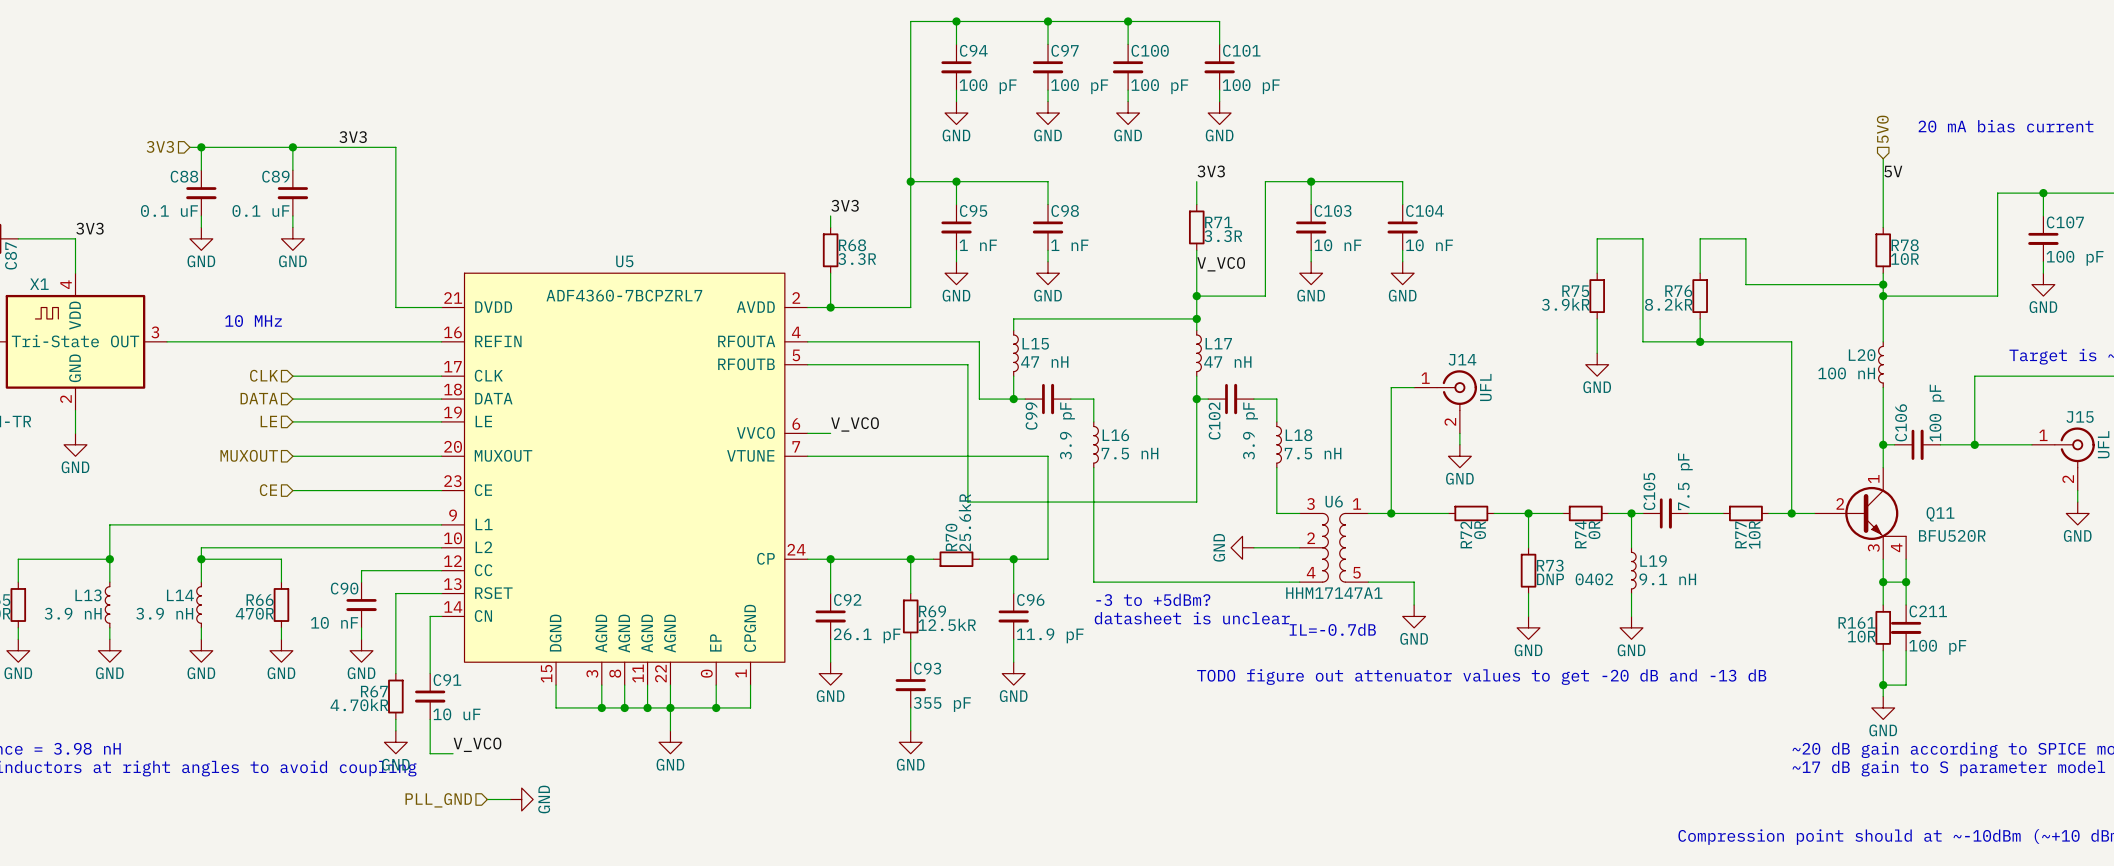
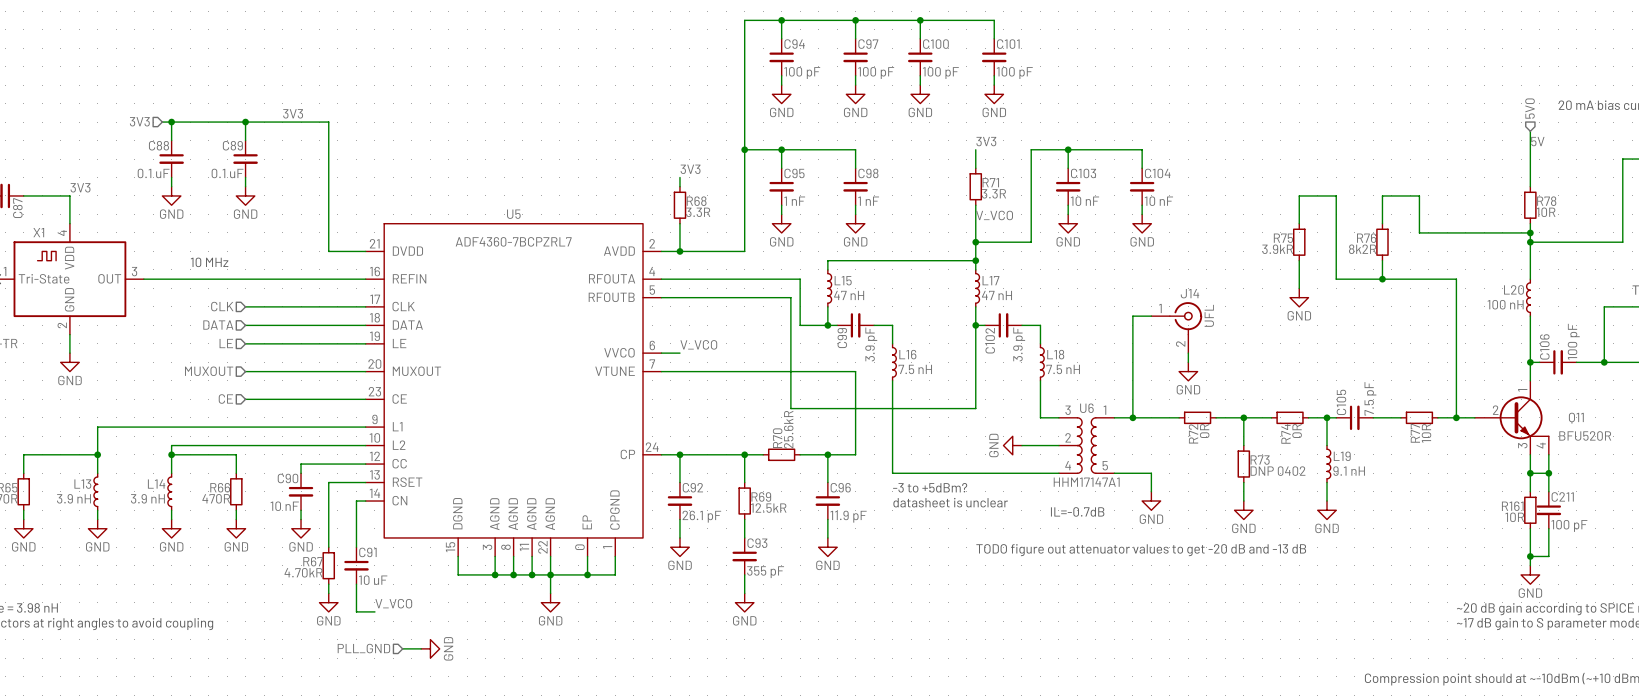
R76 value: 8.2kR (1668, 304) -> 8k2R (1362, 249)

